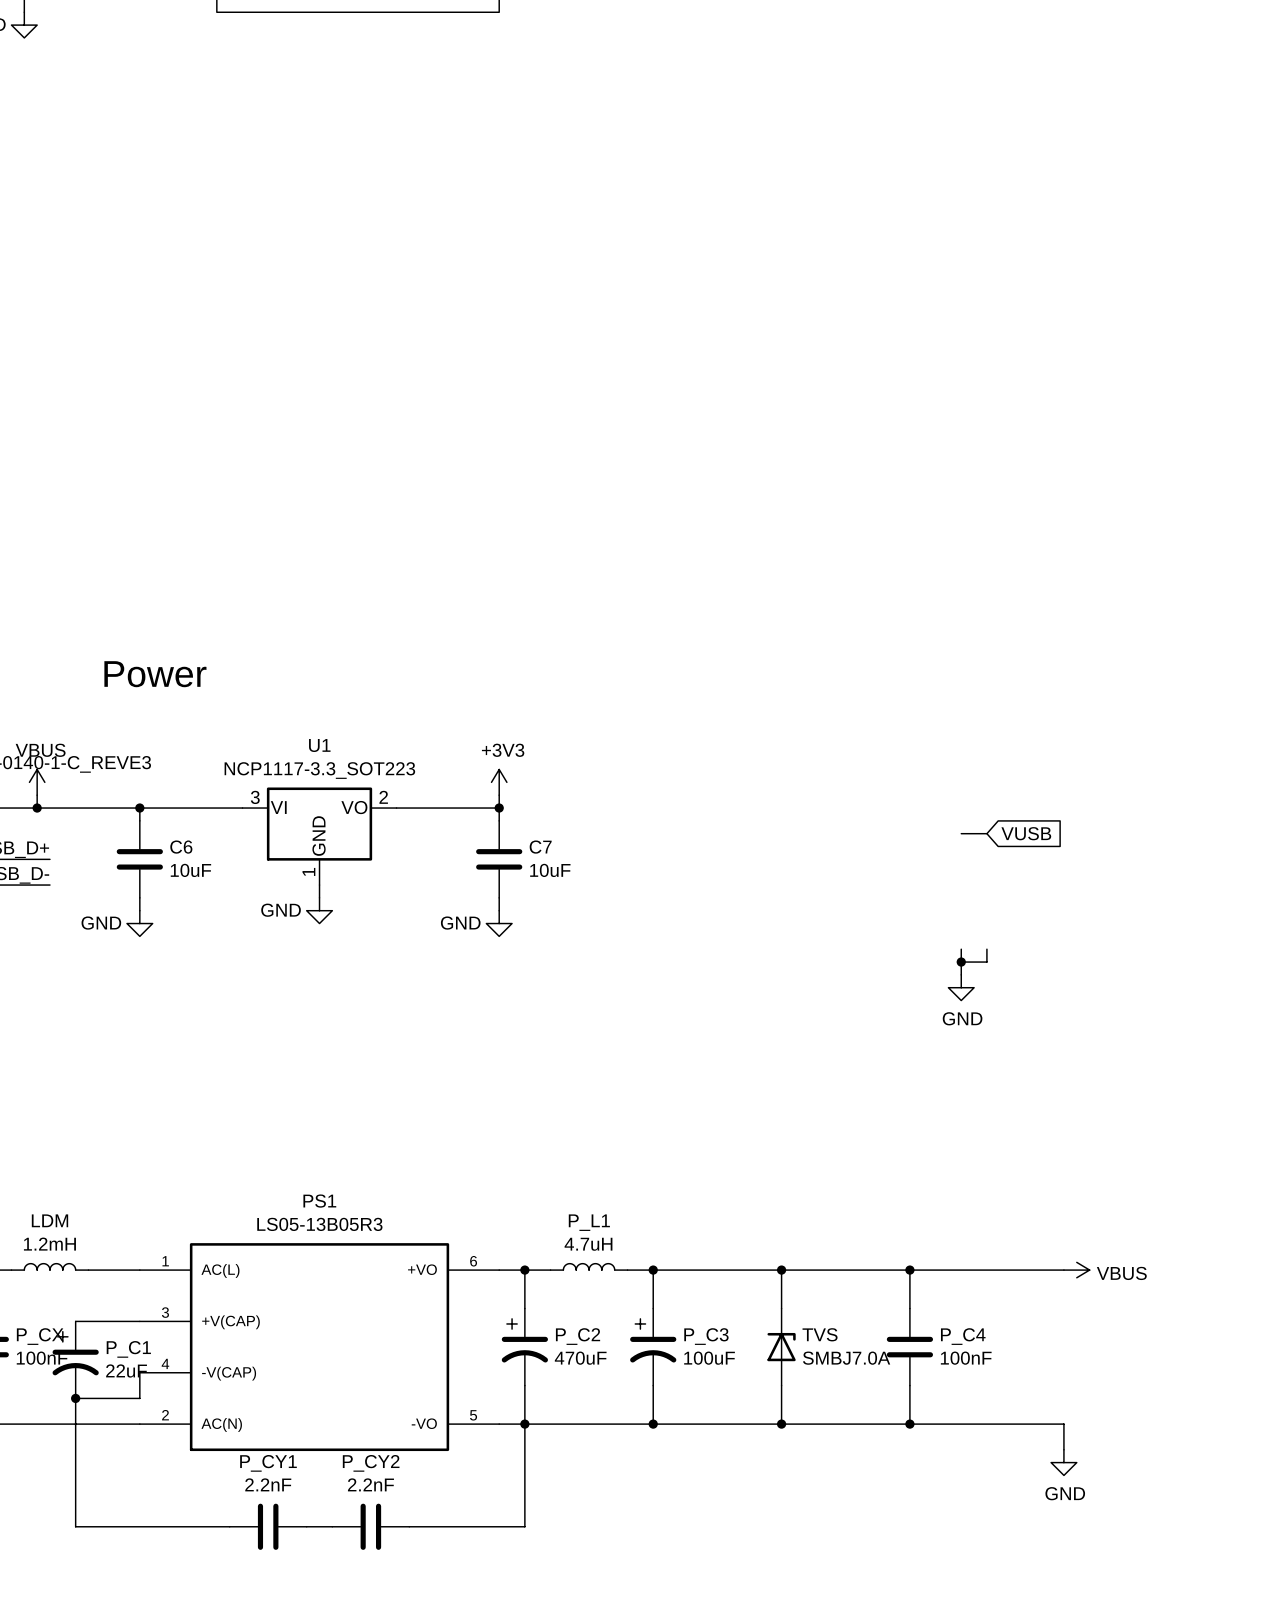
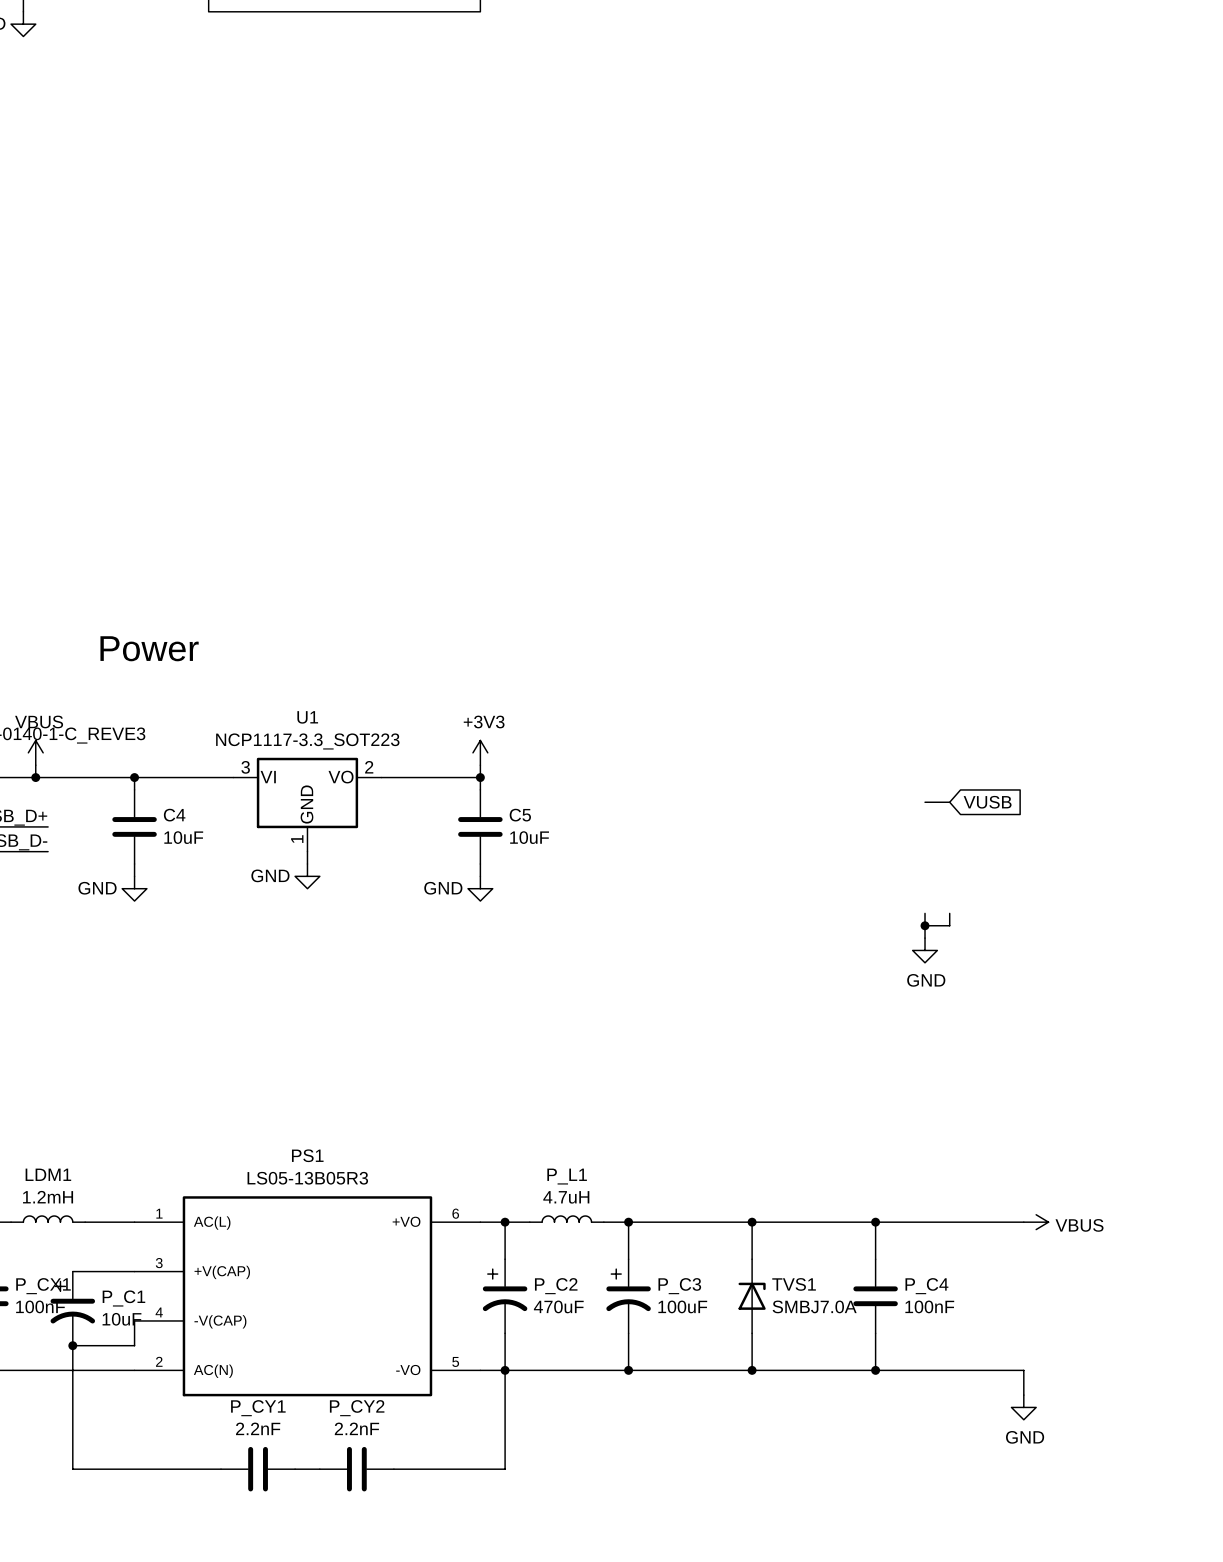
C6 name: C6 (181, 847) -> C4 (174, 815)
C7 name: C7 (540, 847) -> C5 (520, 815)
LDM name: LDM (49, 1220) -> LDM1 (48, 1174)
TVS name: TVS (820, 1334) -> TVS1 (794, 1284)
P_CX name: P_CX (40, 1336) -> P_CX1 (43, 1286)
P_C1 value: 22uF (126, 1370) -> 10uF (121, 1319)

